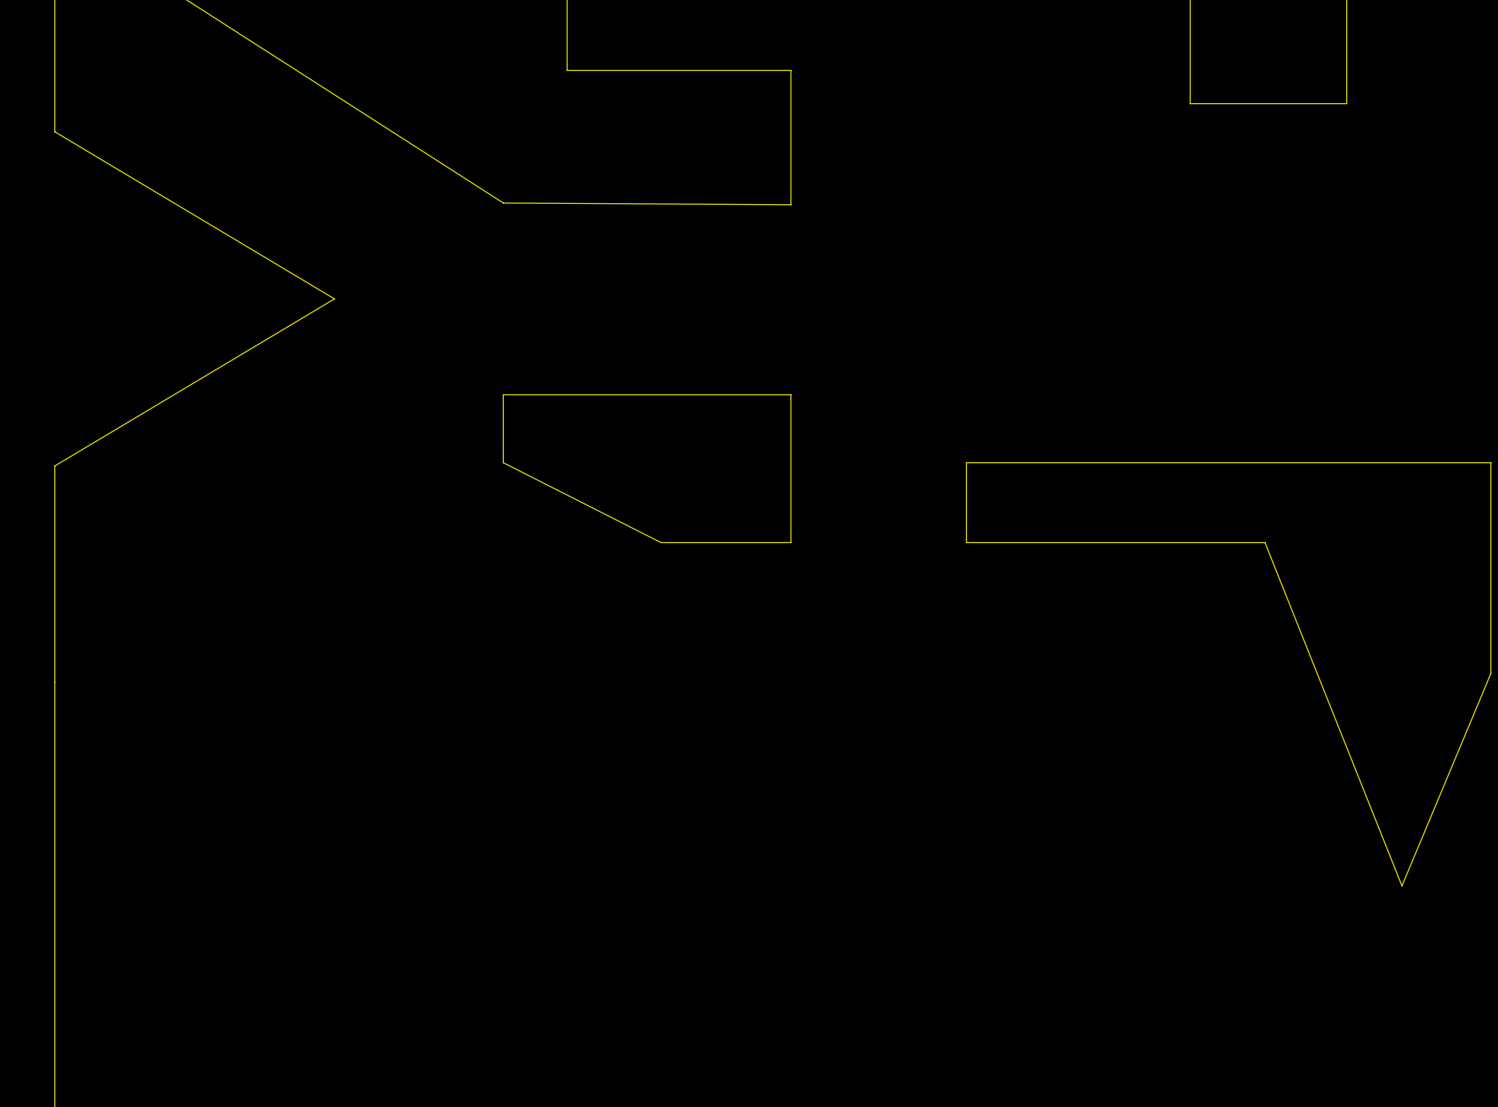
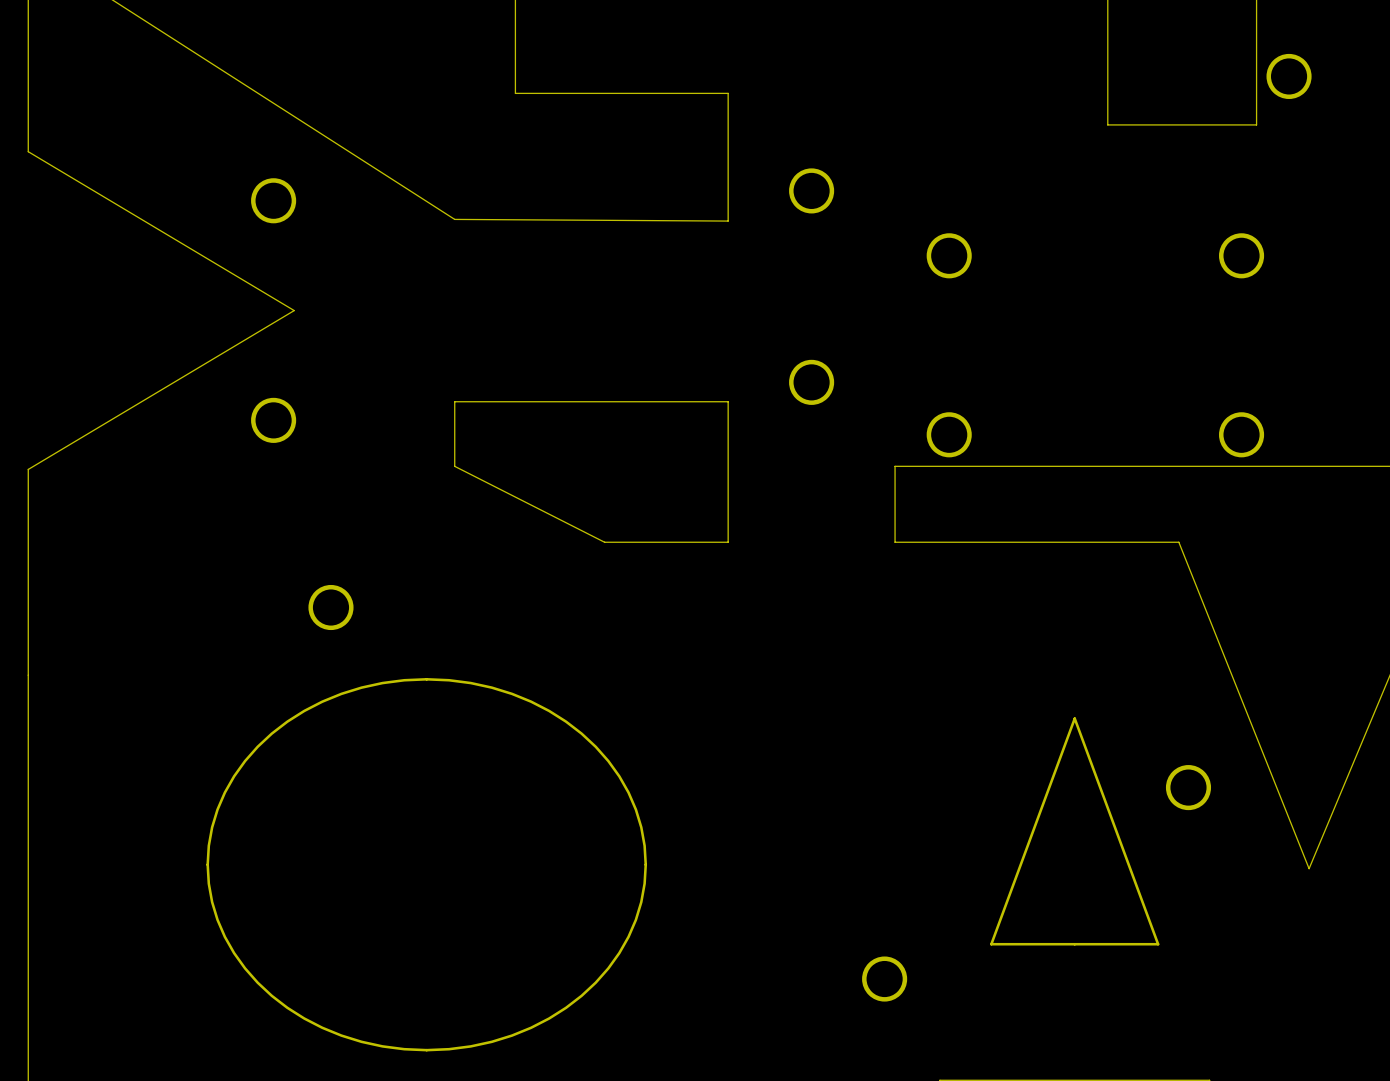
round board edge: none -> [1266, 53, 1312, 100]
round board edge: none -> [789, 168, 835, 214]
round board edge: none -> [251, 178, 297, 224]
round board edge: none -> [926, 233, 972, 279]
round board edge: none -> [1219, 233, 1265, 279]
round board edge: none -> [789, 359, 835, 405]
round board edge: none -> [251, 397, 297, 443]
round board edge: none -> [926, 412, 972, 458]
round board edge: none -> [1219, 412, 1265, 458]
round board edge: none -> [308, 584, 354, 631]
board edge: none -> (426, 679) (470, 683) (511, 693) (549, 710) (581, 733) (608, 761) (628, 792) (641, 827) (645, 864) (641, 902) (628, 936) (608, 968) (581, 995) (549, 1018) (511, 1035) (470, 1046) (426, 1050) (382, 1046) (341, 1035) (304, 1018) (271, 995) (245, 968) (224, 936) (212, 902) (207, 864) (212, 827) (224, 792) (245, 761) (271, 733) (304, 710) (341, 693) (382, 683) (426, 679)
board edge: none -> (1074, 718) (1131, 872) (1158, 944) (991, 944) (1074, 718)
round board edge: none -> [1165, 765, 1212, 811]
round board edge: none -> [862, 956, 908, 1002]

